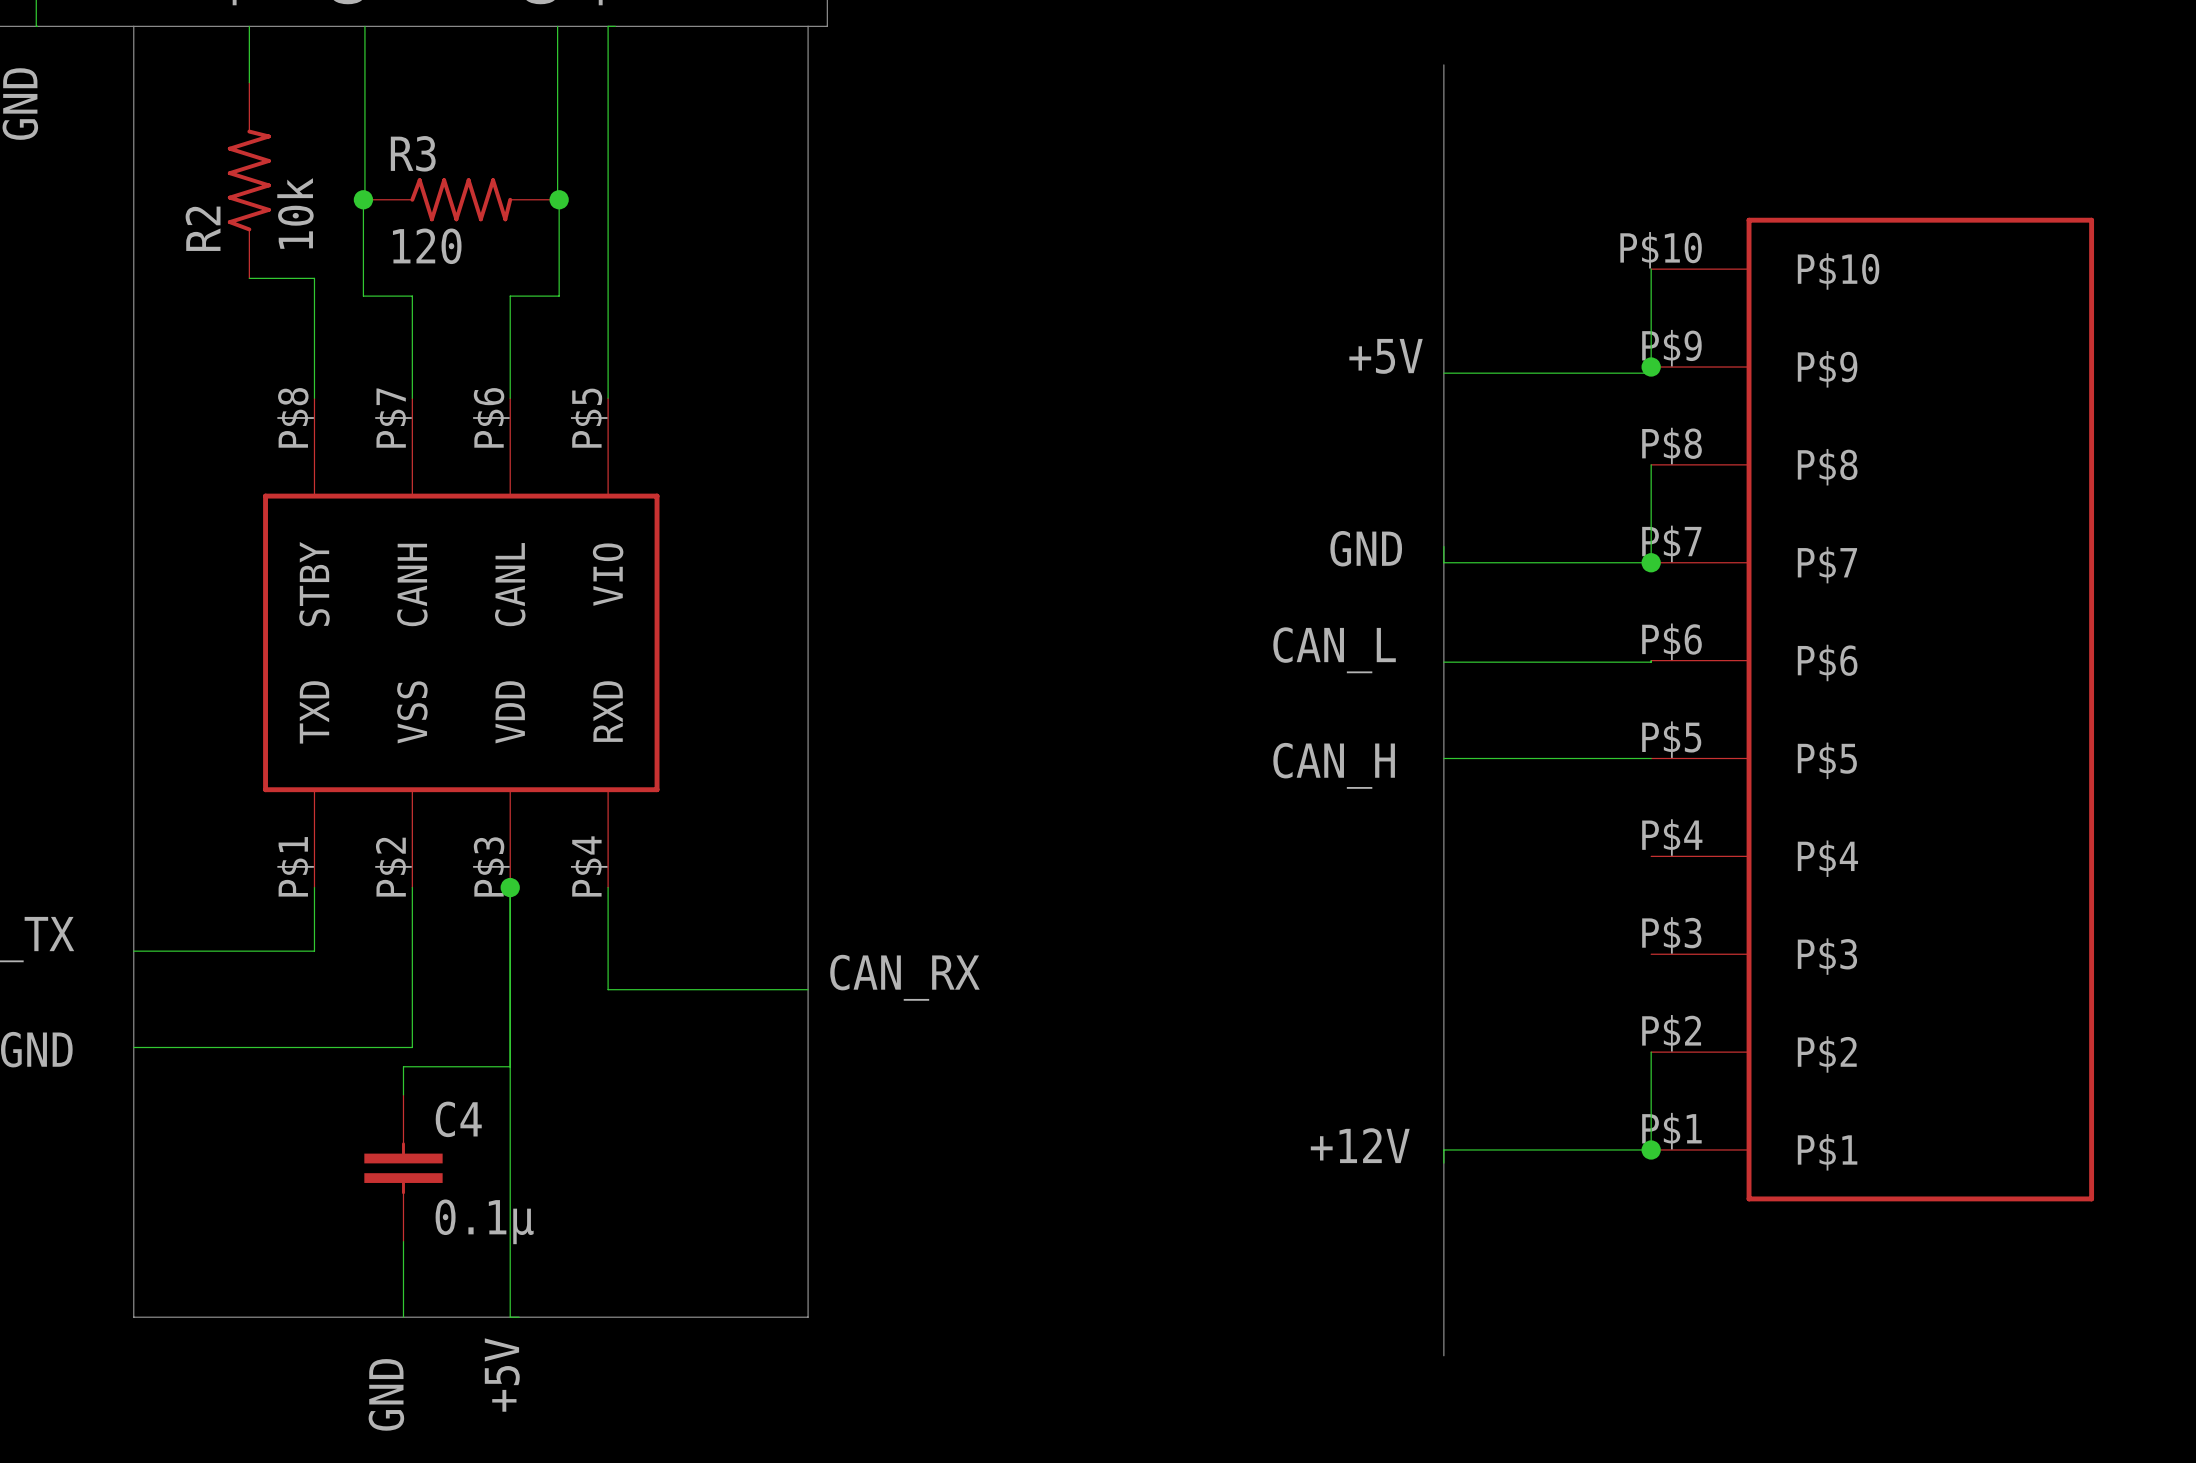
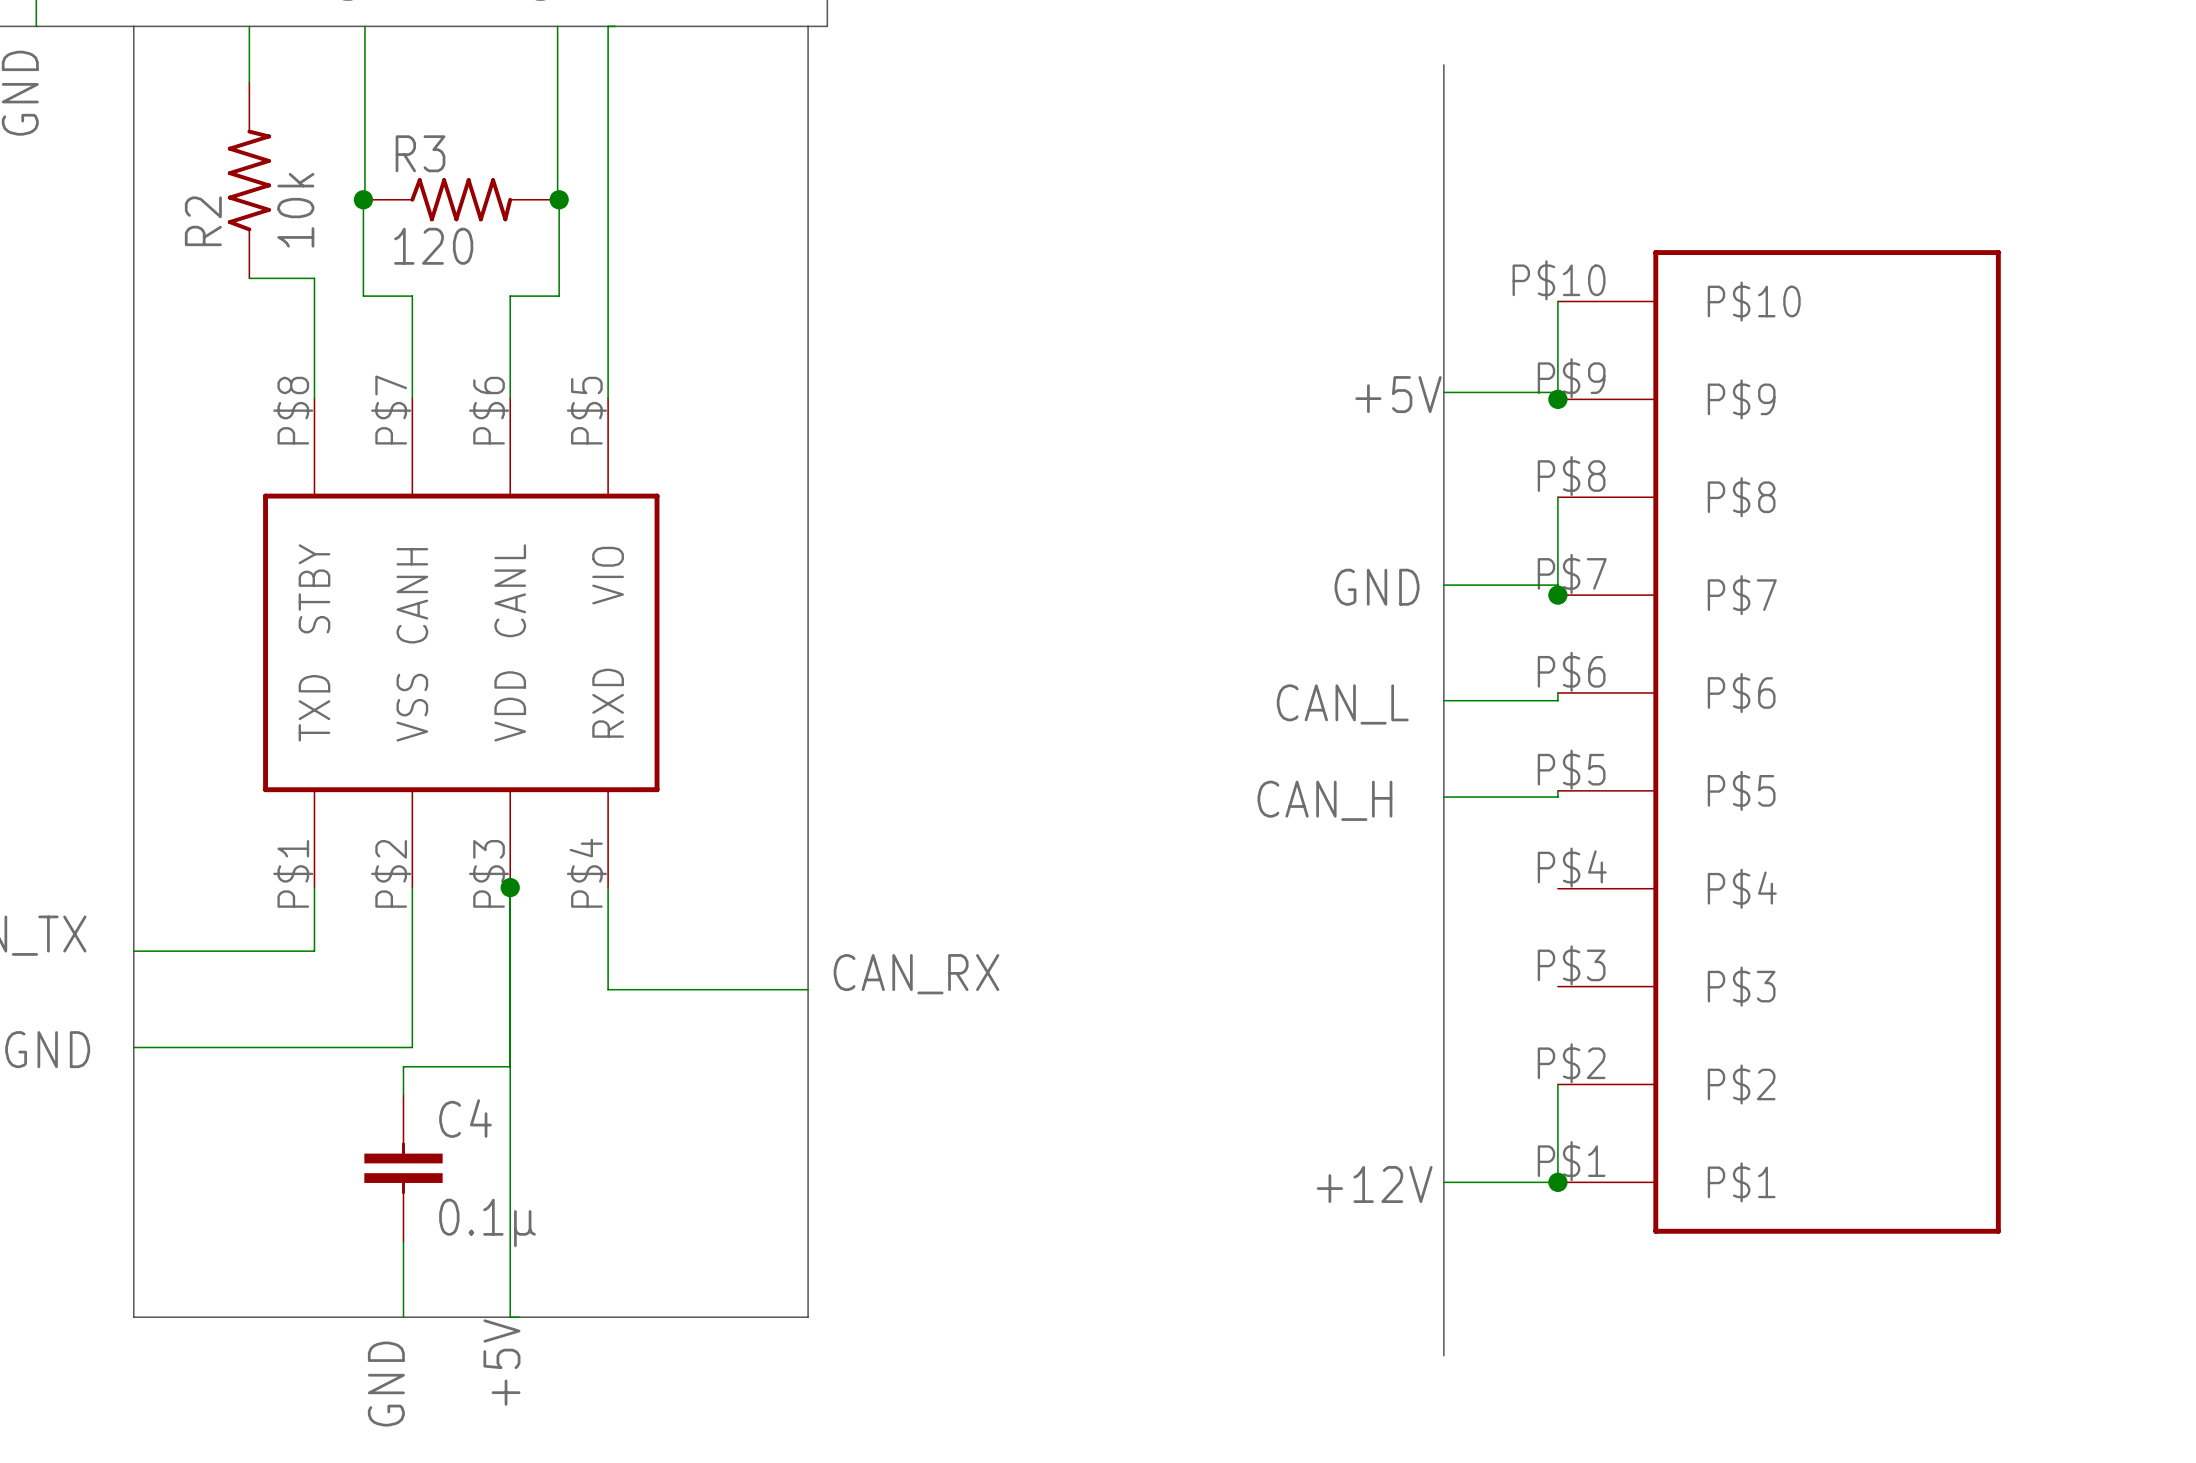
wire: (1651, 269) (1651, 373) (1443, 373) -> none
wire: none -> (1557, 301) (1557, 399)
label position: +5V (1386, 356) -> +5V (1398, 394)
junction: (1651, 367) -> none
wire: none -> (1443, 392) (1557, 392)
junction: none -> (1557, 399)
wire: (1651, 464) (1651, 562) (1443, 562) (1443, 546) -> none
wire: none -> (1557, 497) (1557, 595)
label position: GND (1366, 548) -> GND (1377, 587)
junction: (1651, 562) -> none
wire: none -> (1443, 585) (1557, 585)
junction: none -> (1557, 595)
label position: CAN_L (1334, 650) -> CAN_L (1342, 704)
wire: (1651, 660) (1651, 662) (1443, 662) -> none
wire: none -> (1557, 692) (1557, 700) (1443, 700)
part position: (1872, 709) -> (1779, 741)
wire: (1443, 758) (1651, 758) -> none
label position: CAN_H (1334, 765) -> CAN_H (1324, 800)
wire: none -> (1557, 790) (1557, 797) (1443, 797)
wire: (1651, 1052) (1651, 1149) (1443, 1149) (1443, 1163) -> none
wire: none -> (1557, 1084) (1557, 1182) (1443, 1182)
label position: +12V (1360, 1145) -> +12V (1374, 1184)
junction position: (1651, 1149) -> (1557, 1182)

